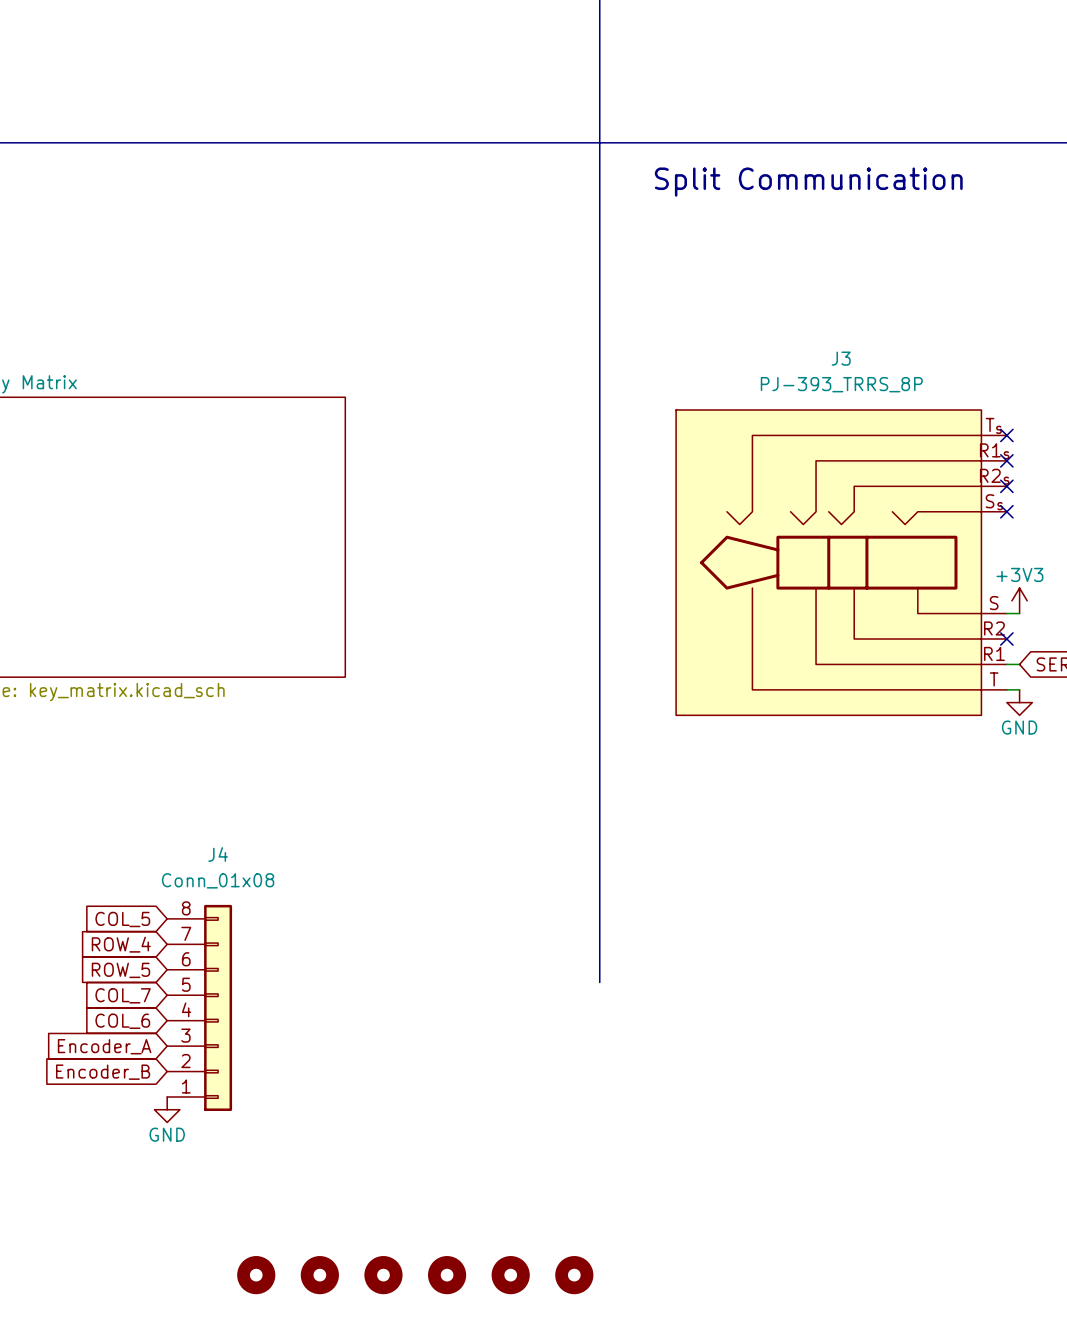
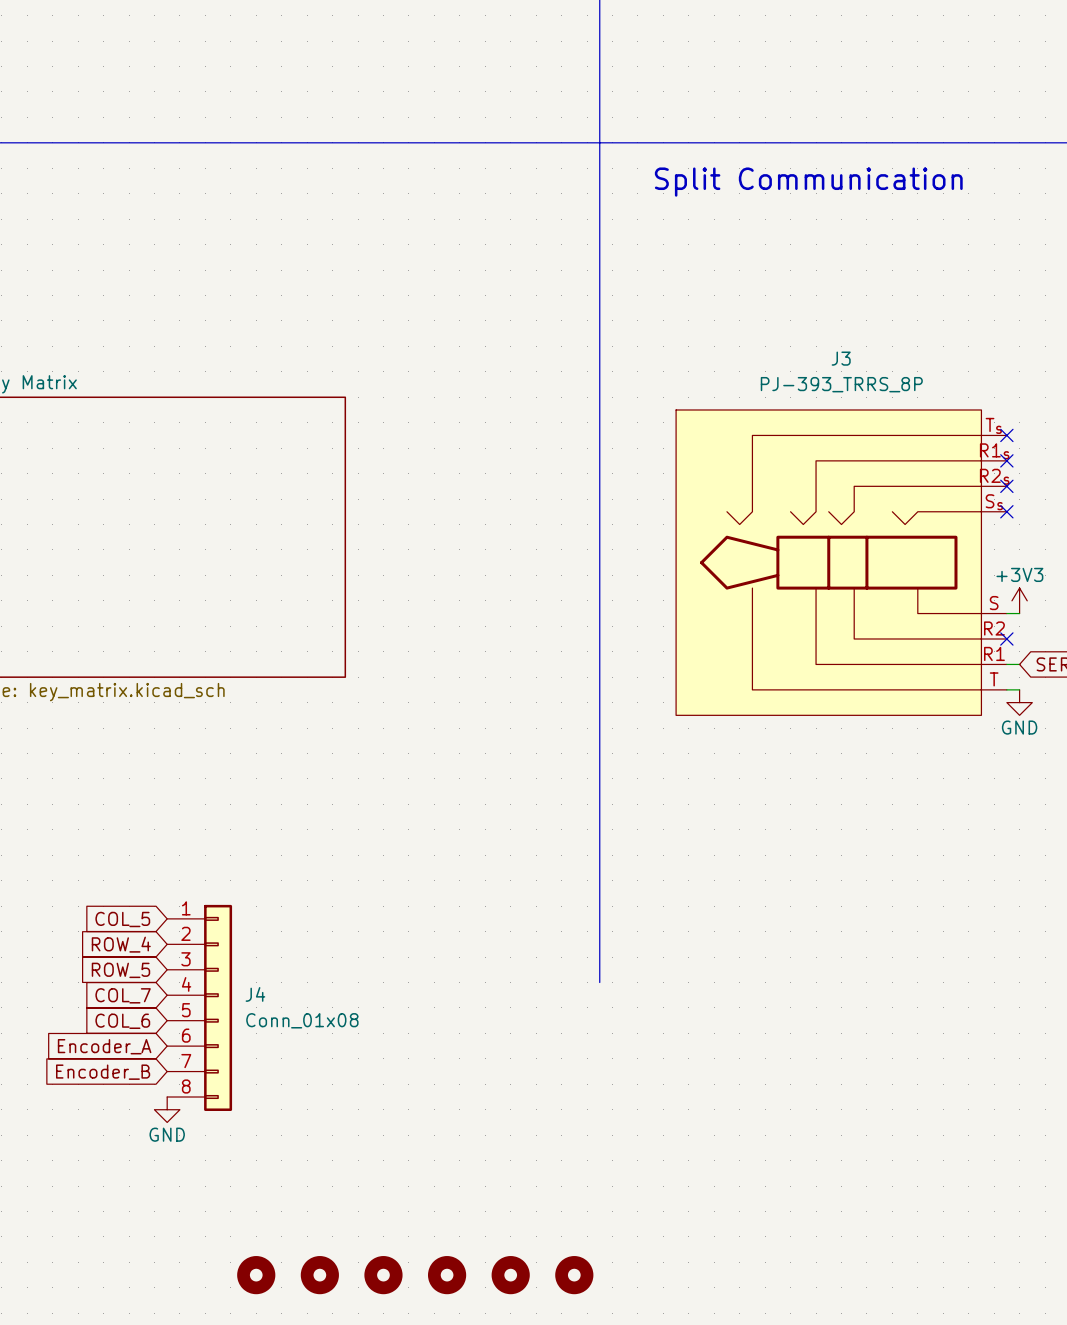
J4 name position: J4 (218, 854) -> J4 (255, 994)
J4 value position: Conn_01x08 (218, 880) -> Conn_01x08 (302, 1020)
J4 flip: as is (218, 1007) -> up-down (218, 1007)

